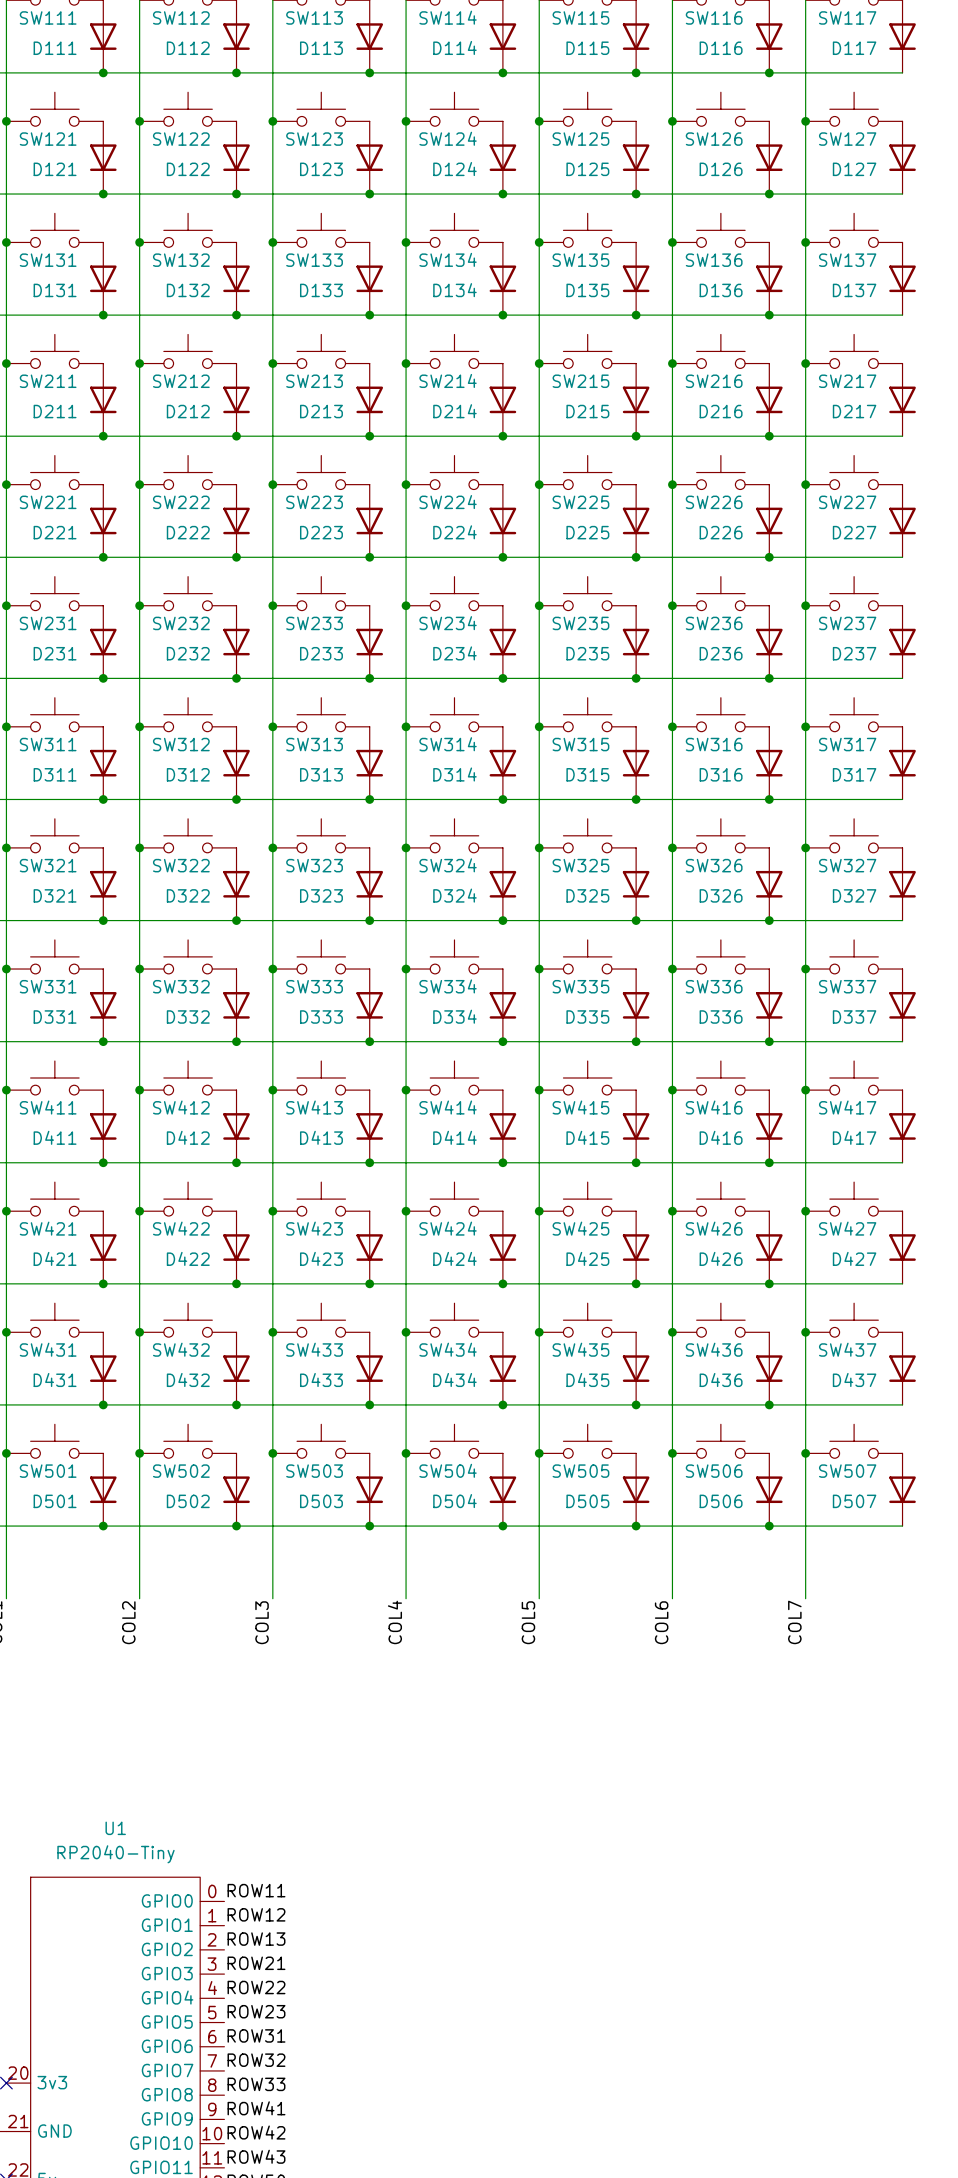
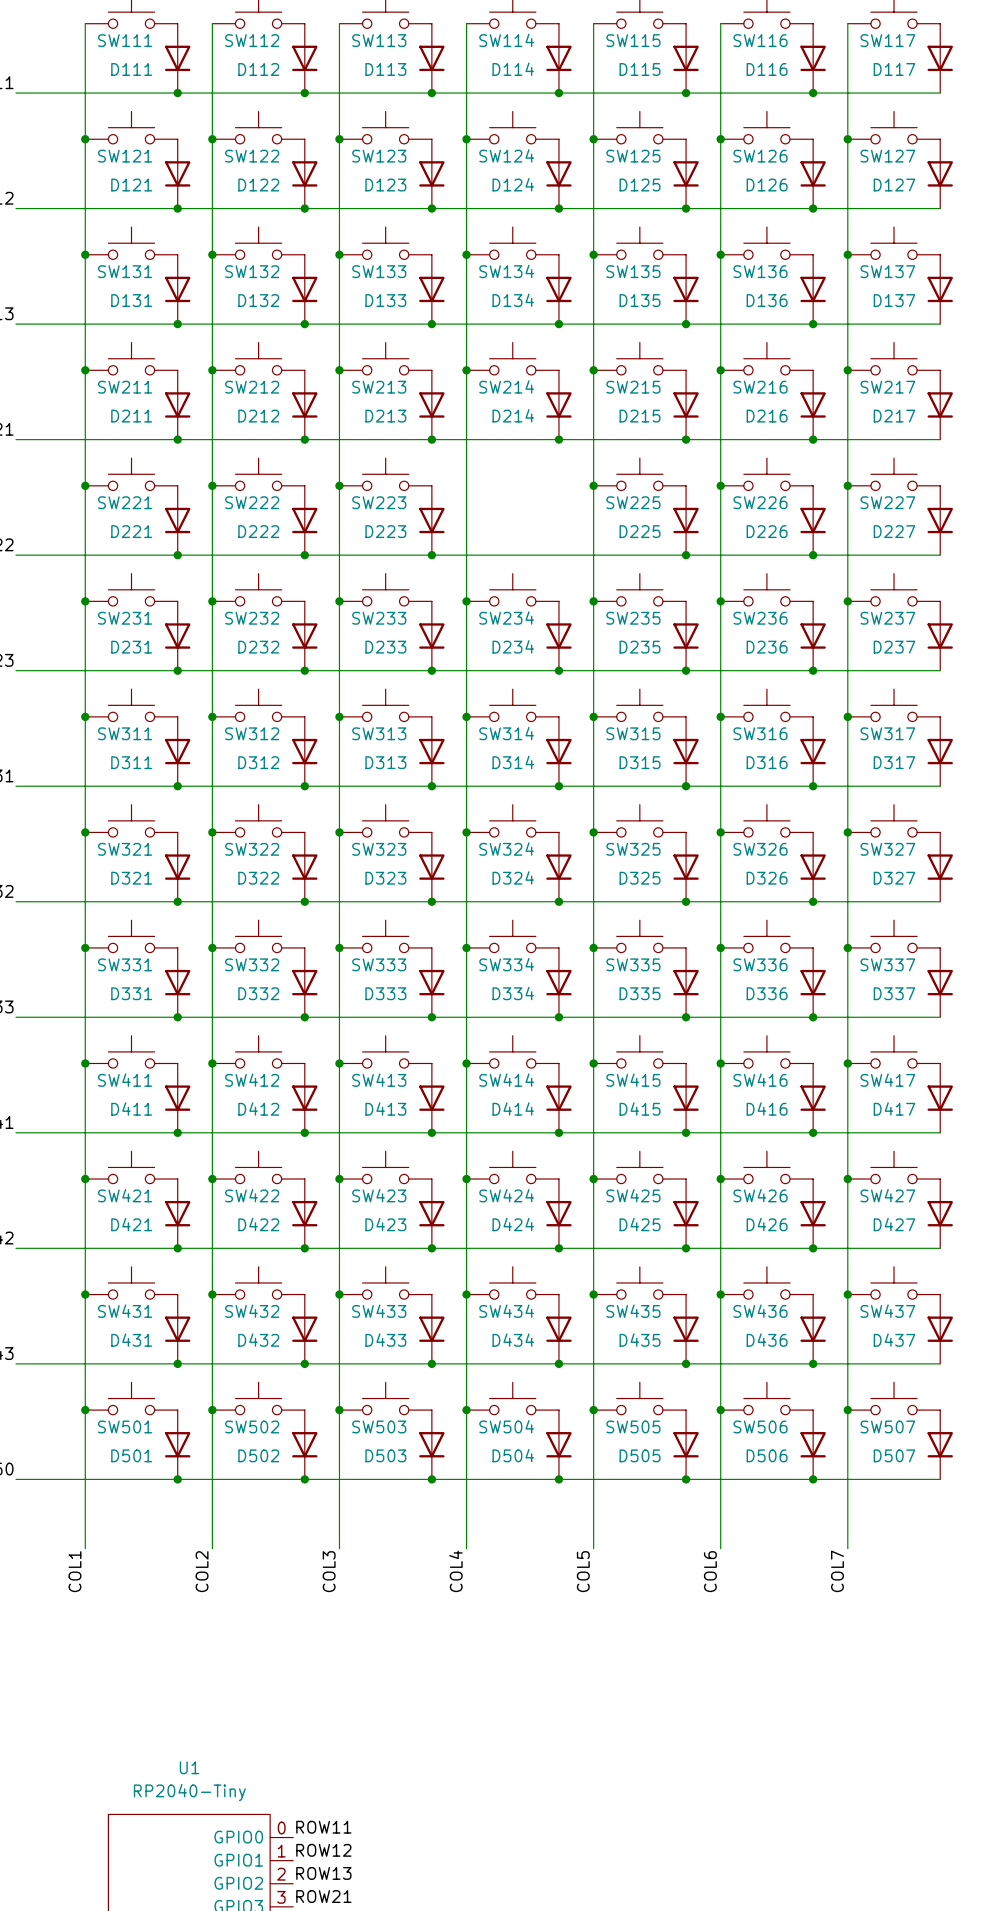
SW224: (454, 472) -> none
junction: (406, 484) -> none
D224: (502, 520) -> none
junction: (502, 557) -> none

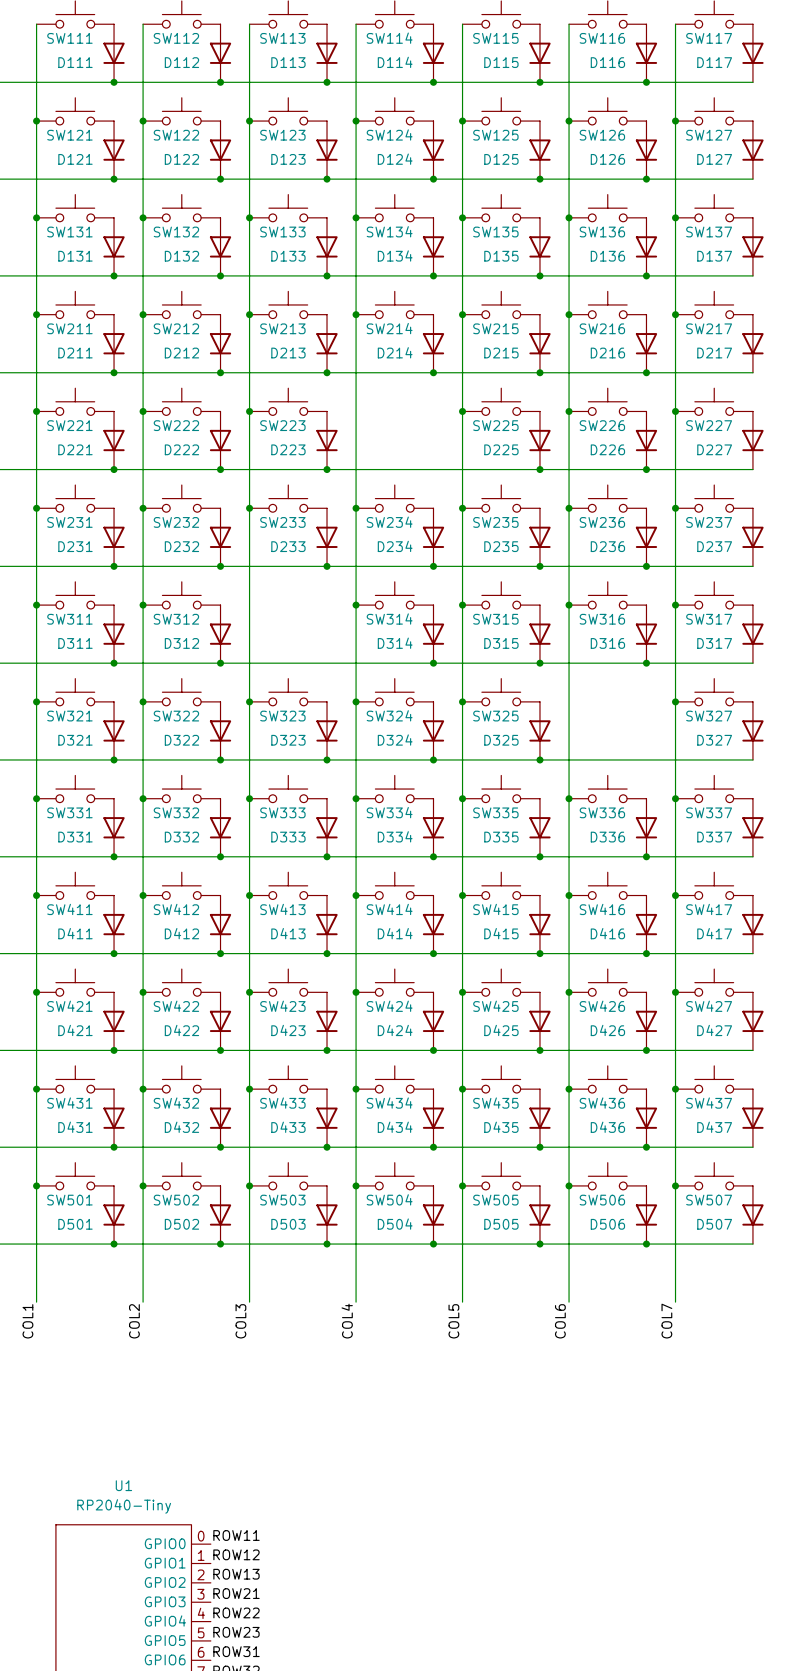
SW313: (385, 705) -> none
junction: (339, 716) -> none
D313: (431, 751) -> none
junction: (431, 786) -> none
SW326: (766, 820) -> none
junction: (720, 832) -> none
D326: (813, 867) -> none
junction: (813, 901) -> none

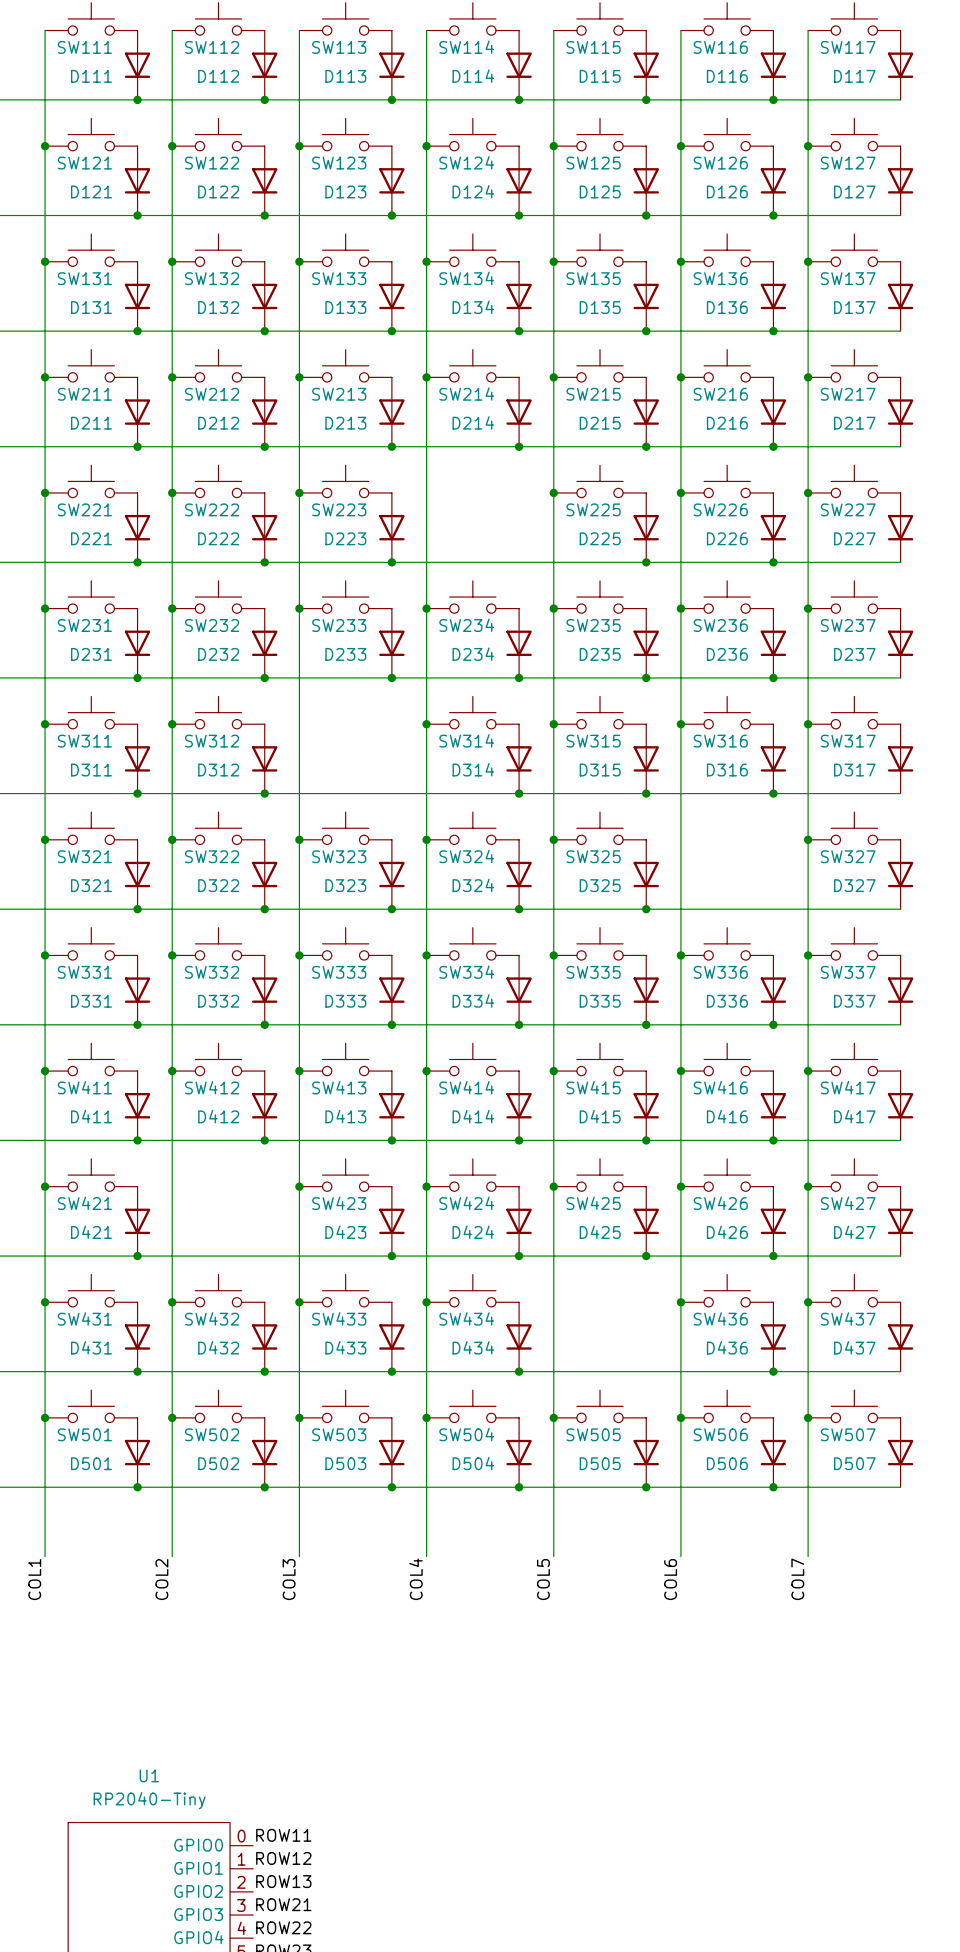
SW422: (181, 982) -> none
junction: (143, 992) -> none
D422: (220, 1021) -> none
junction: (220, 1050) -> none
SW435: (501, 1079) -> none
junction: (462, 1089) -> none
D435: (539, 1118) -> none
junction: (539, 1147) -> none

